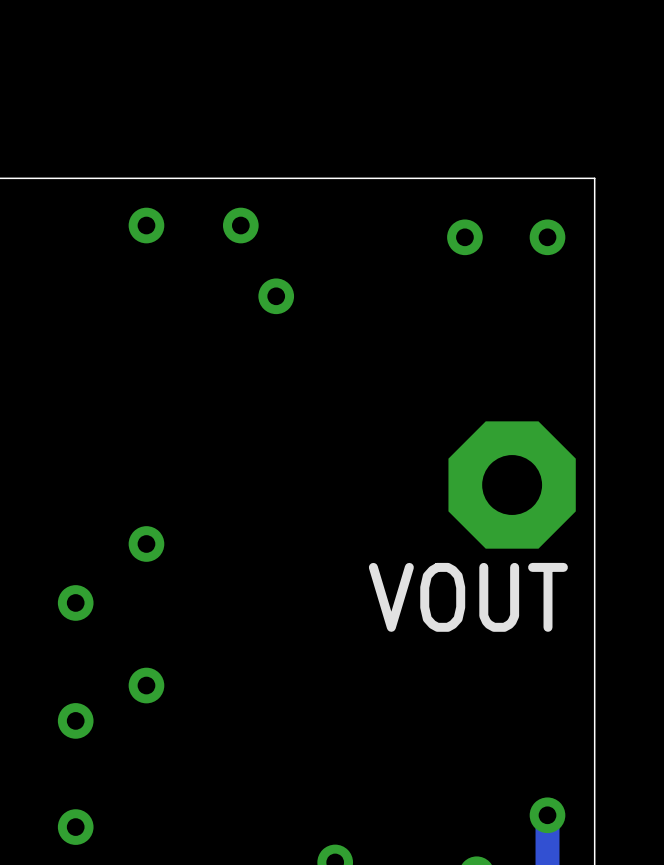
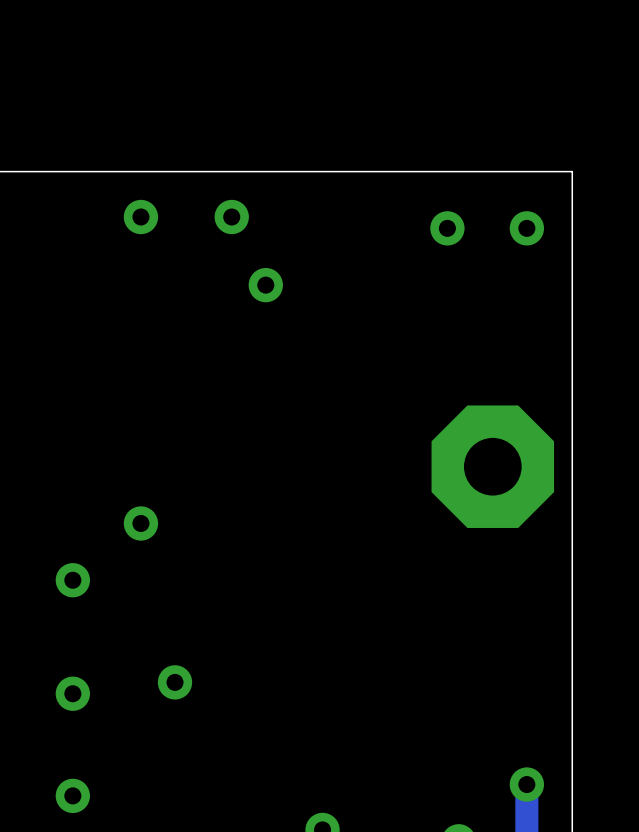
VOUT name: VOUT (468, 597) -> none
via position: (146, 685) -> (175, 682)

